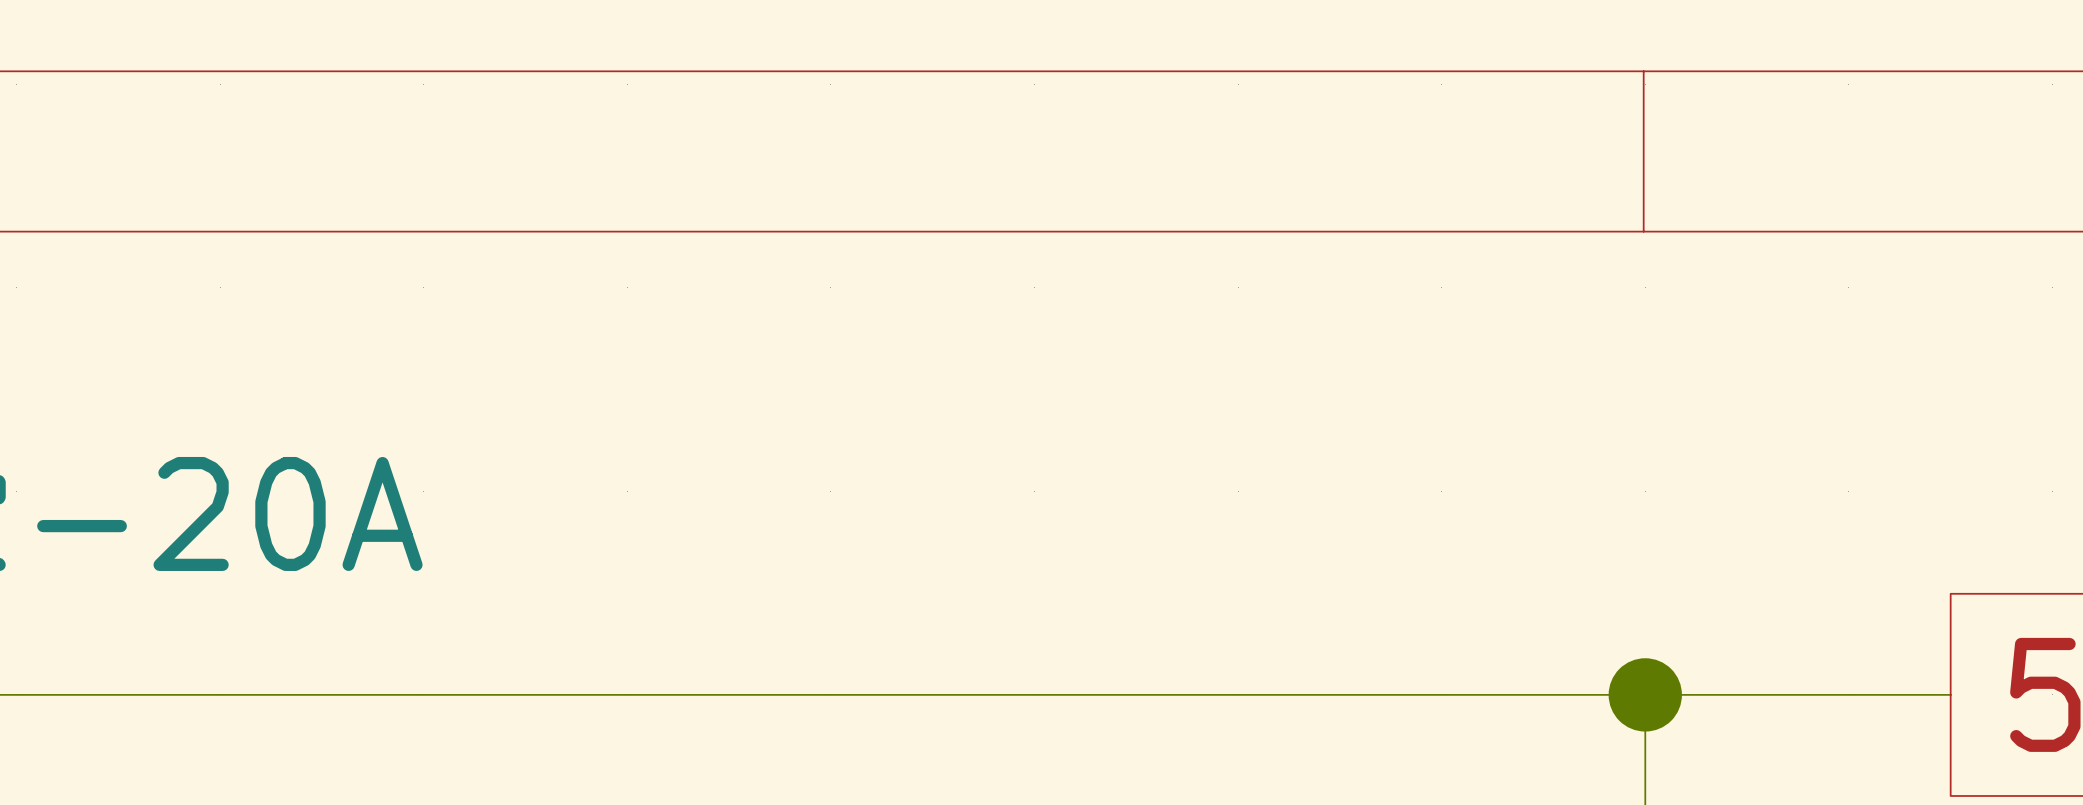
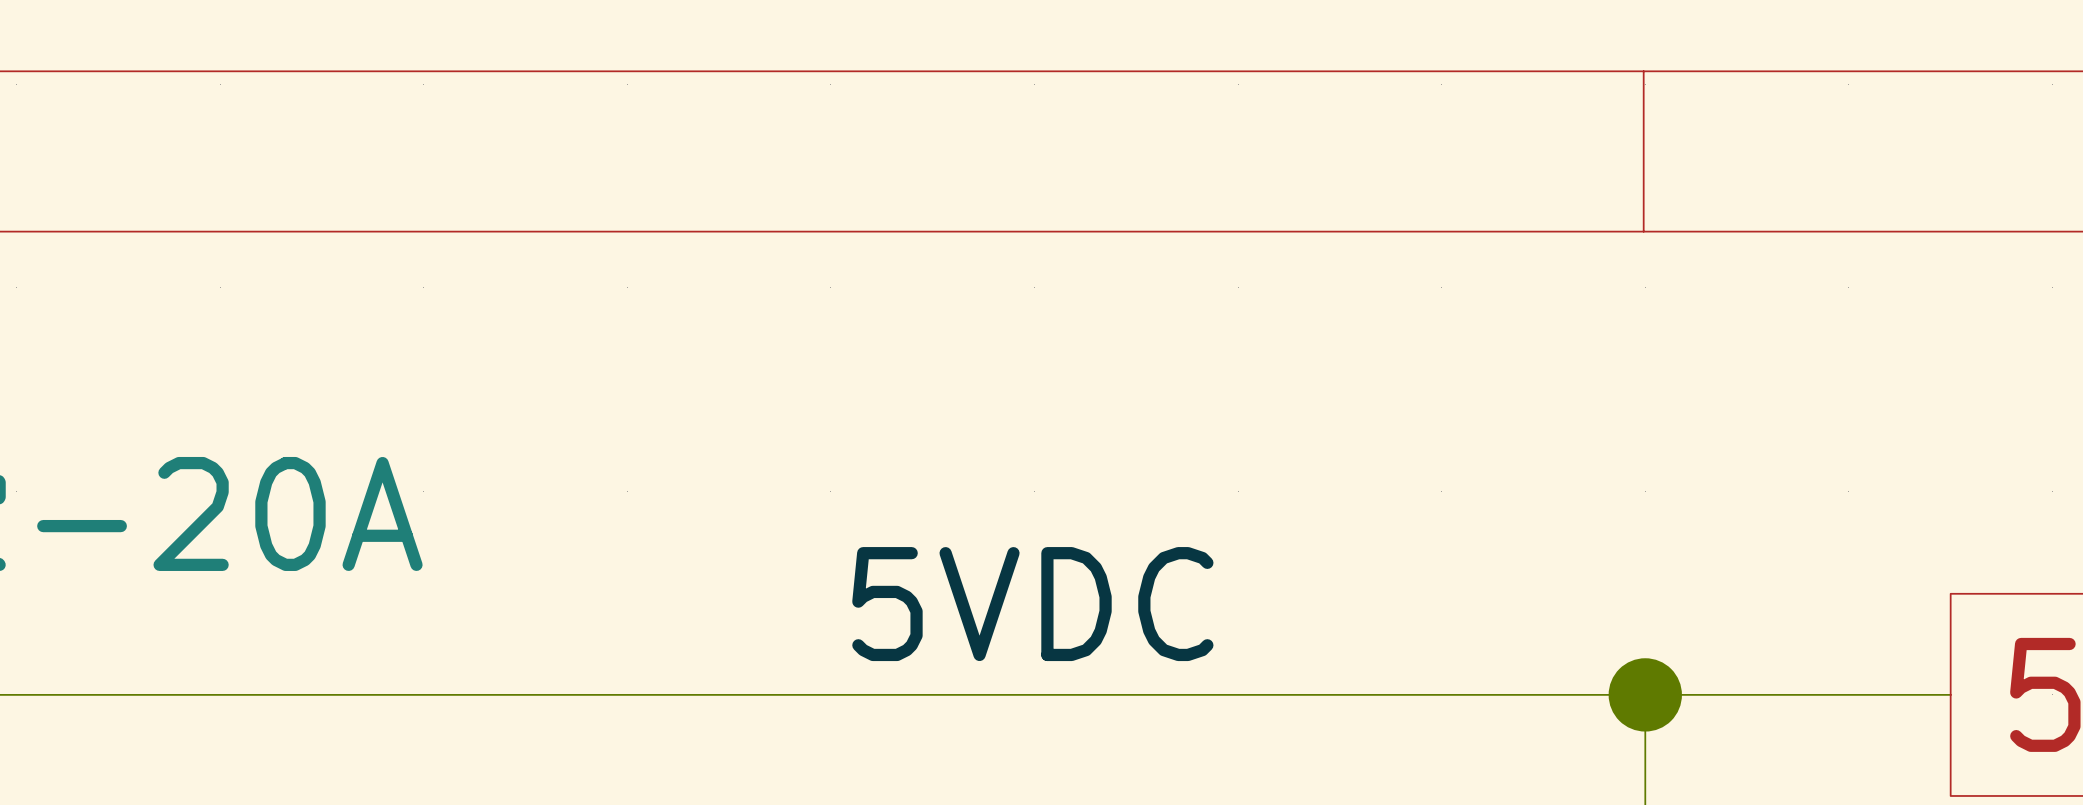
label: none -> 5VDC (1032, 604)

